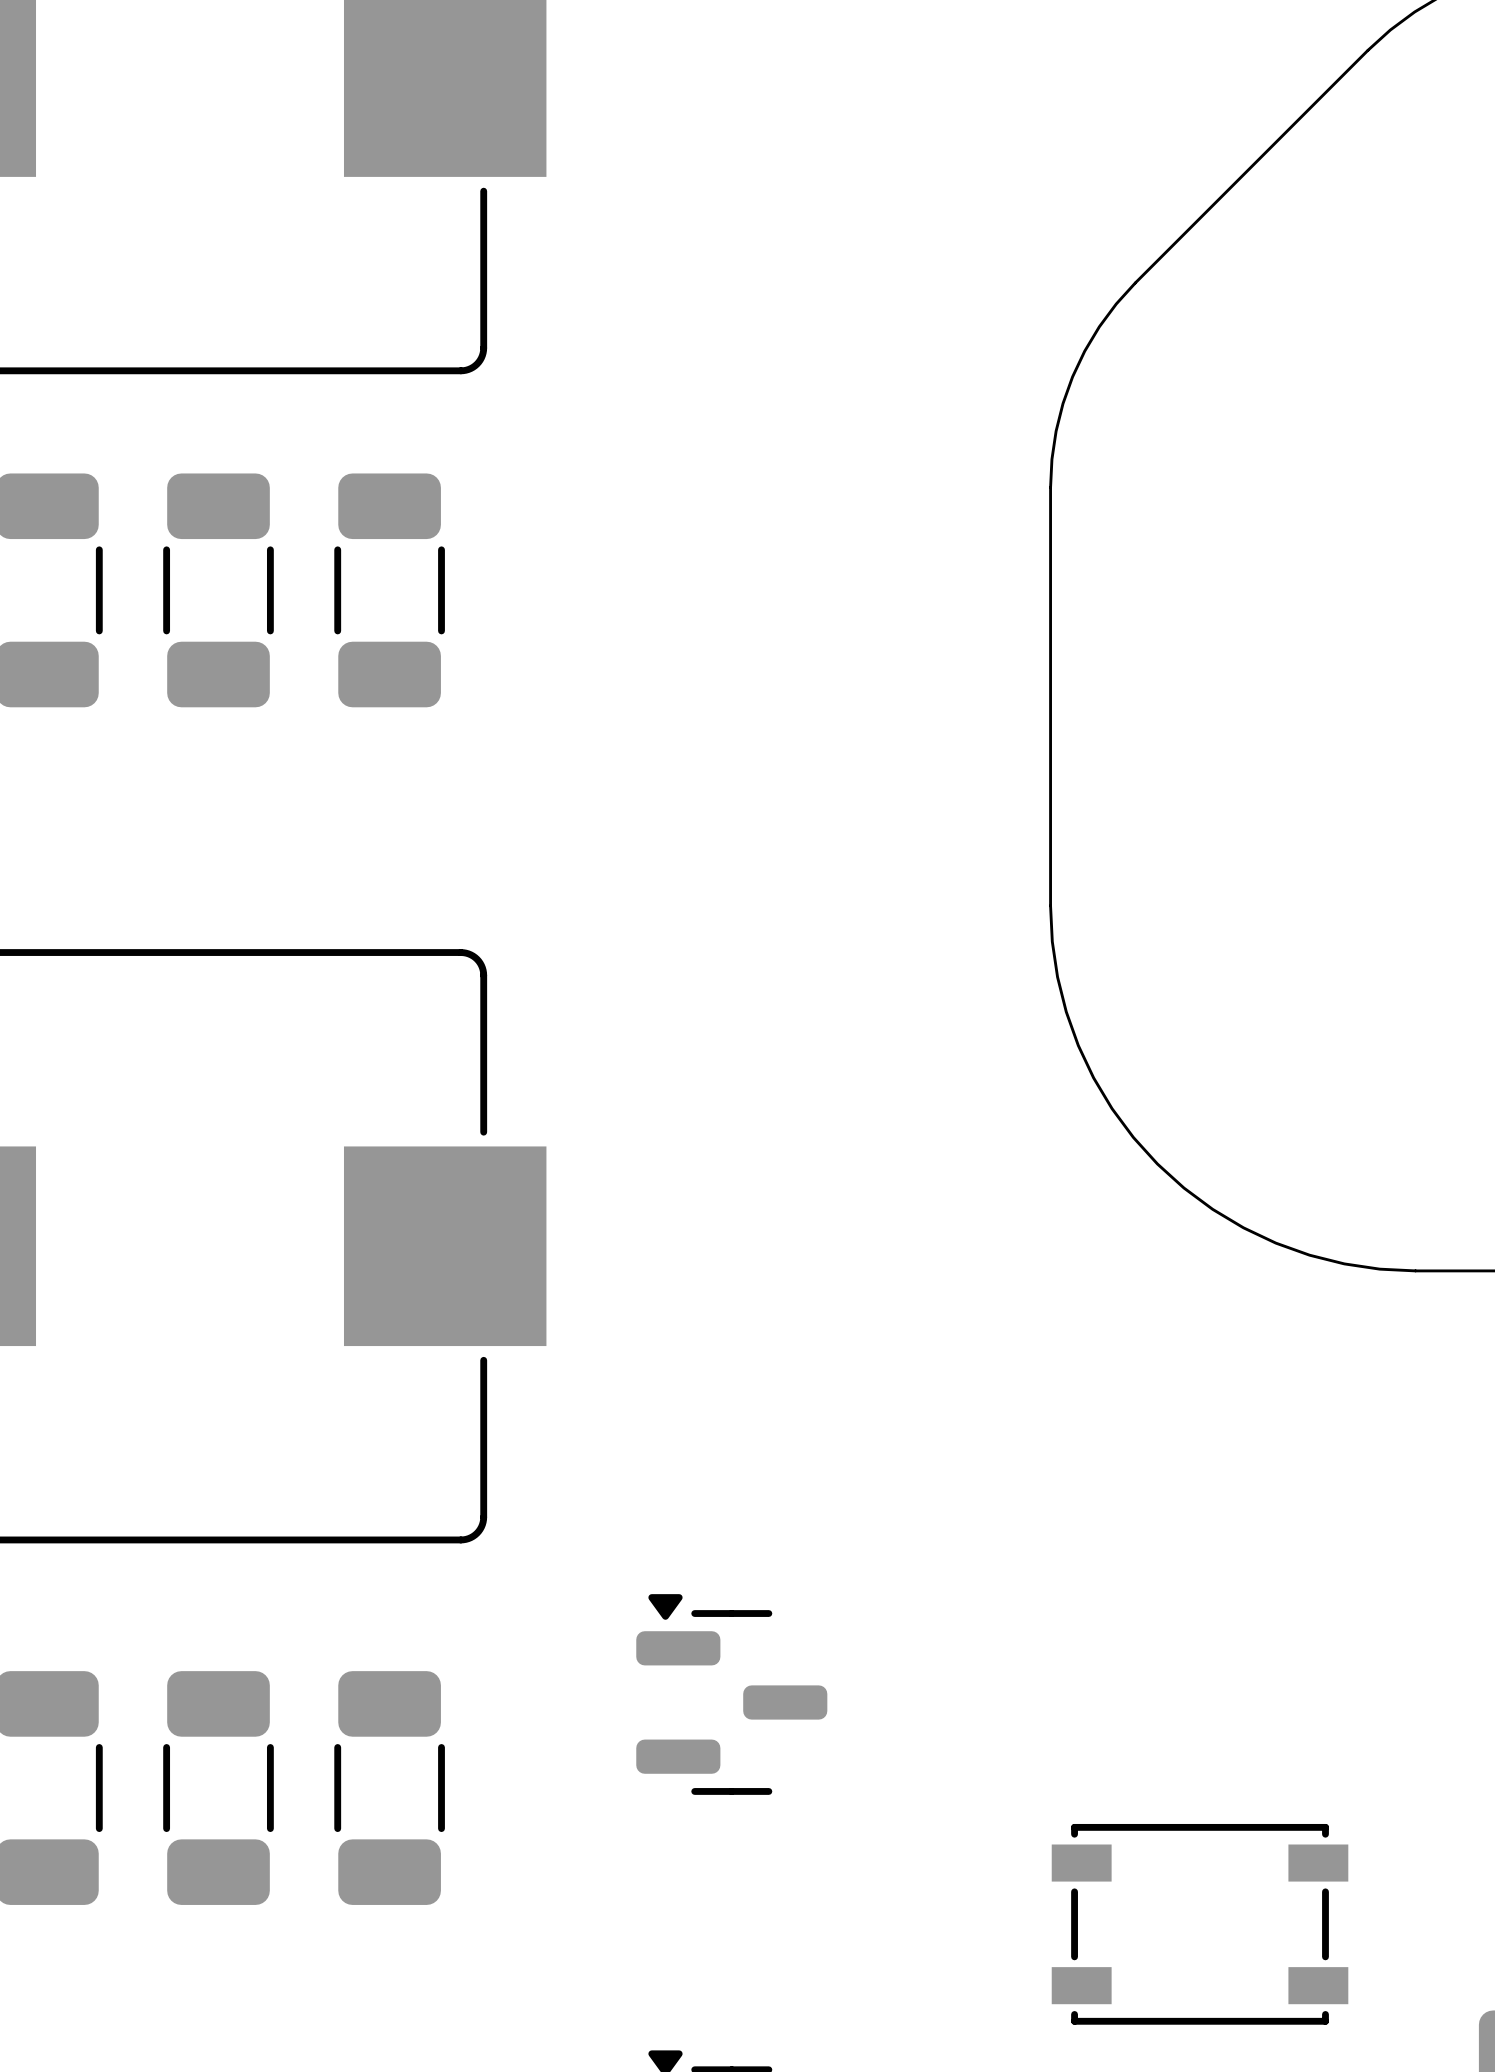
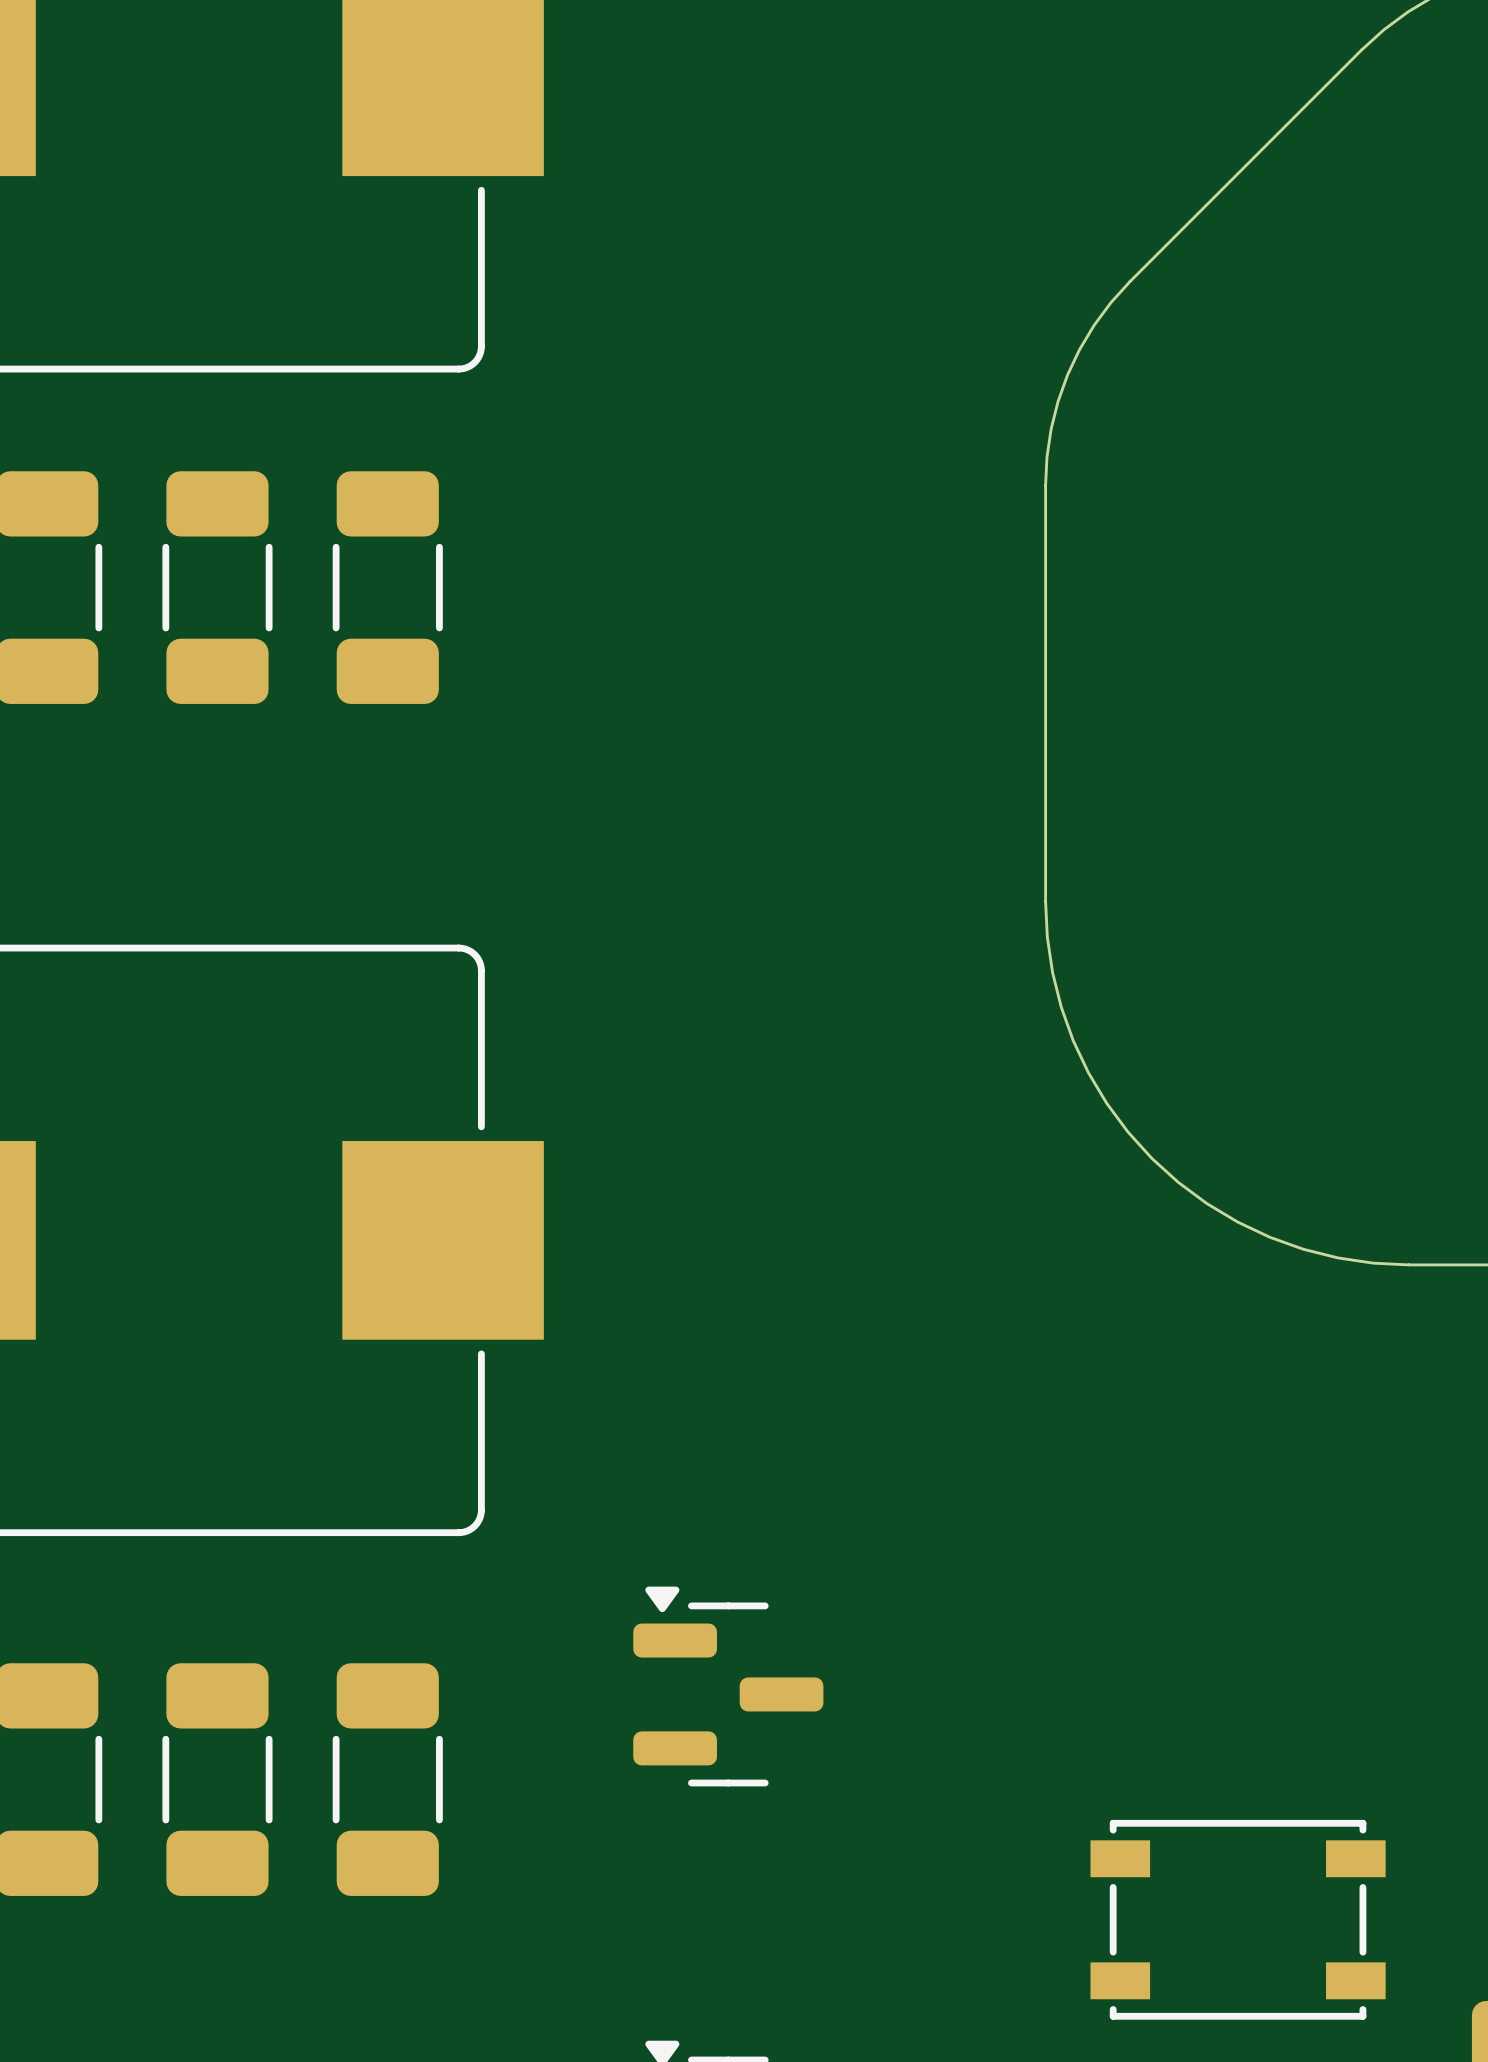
part position: (1200, 1924) -> (1238, 1919)

